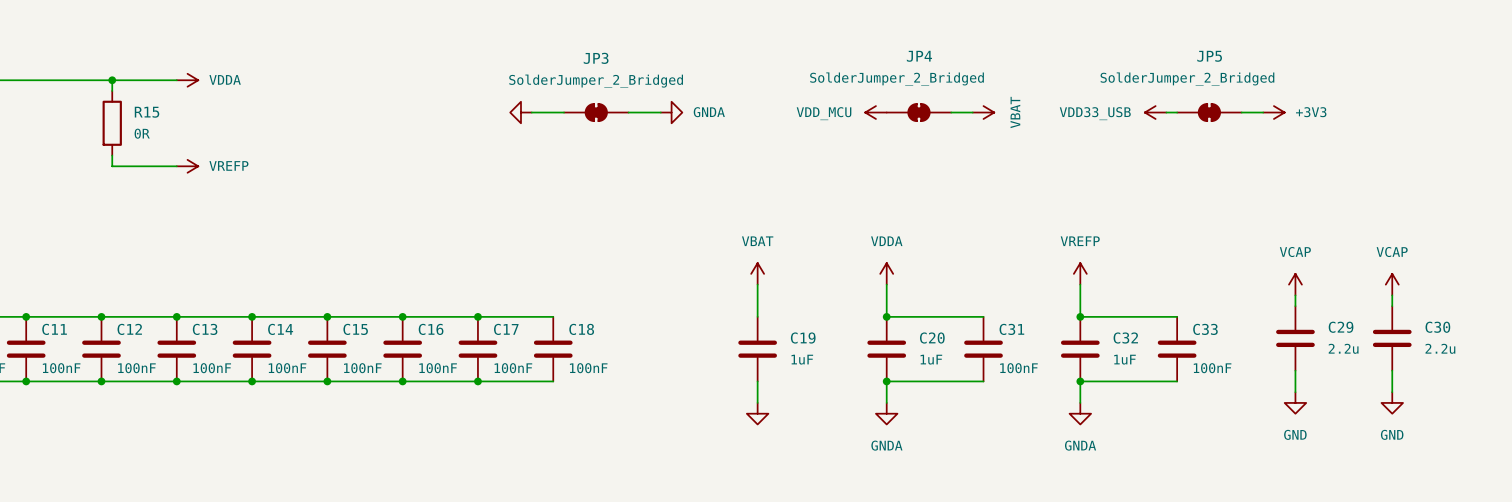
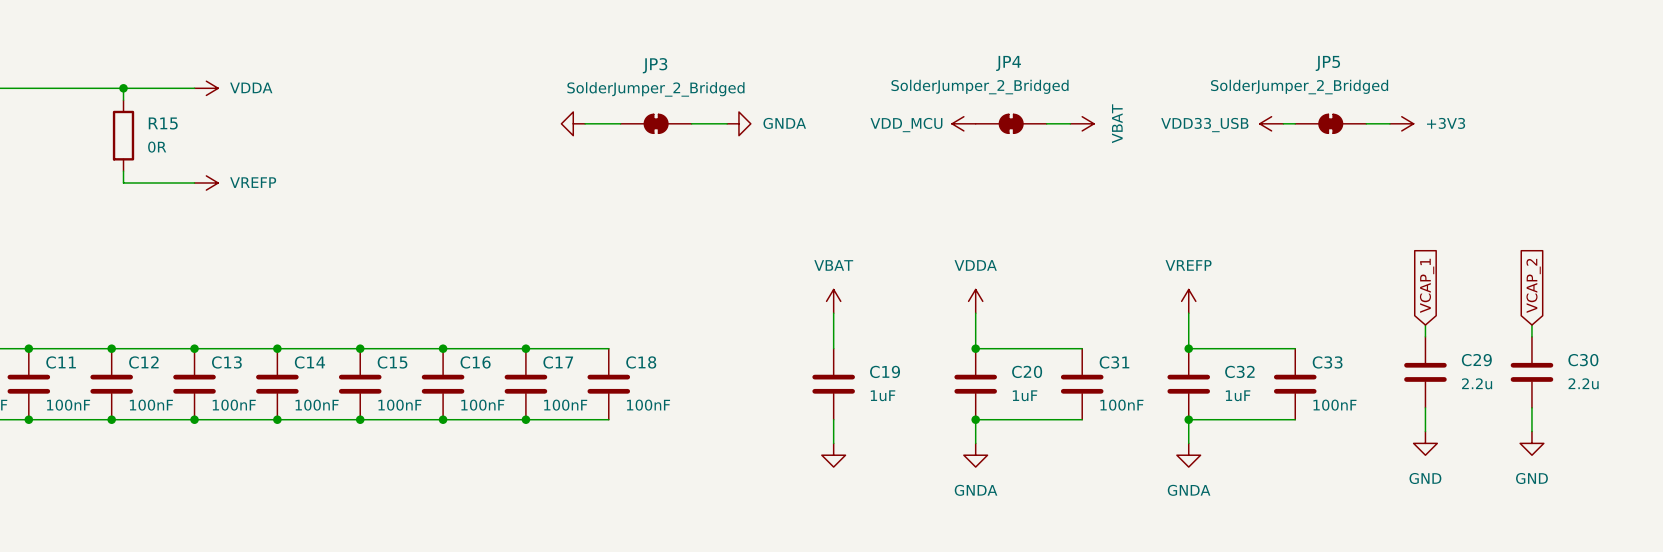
global label: none -> VCAP_1 (1427, 285)
global label: none -> VCAP_2 (1533, 285)
power symbol: VCAP (1295, 284) -> none
power symbol: VCAP (1392, 284) -> none

